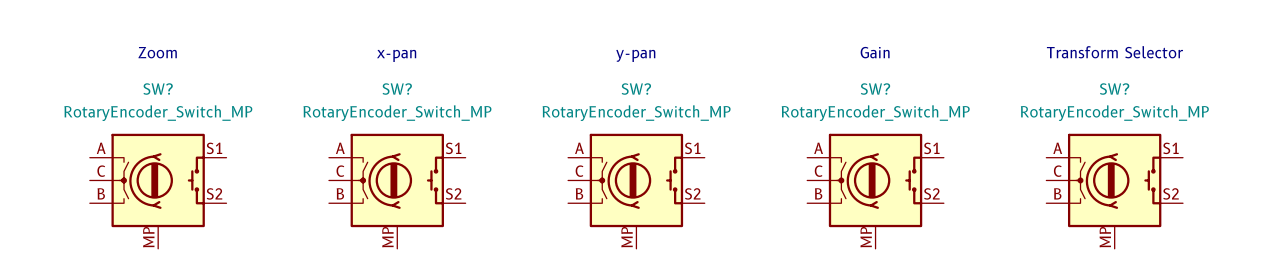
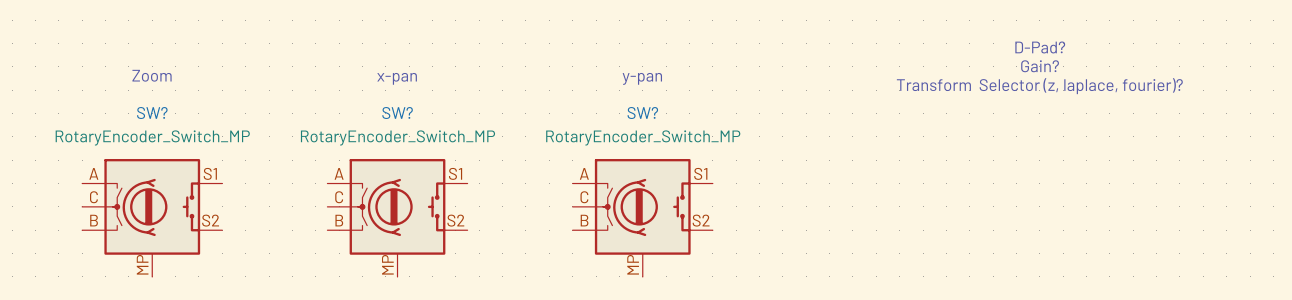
text: none -> D-Pad? (1040, 47)
text: none -> Gain? (1040, 66)
text: Gain (875, 52) -> none
text: Transform Selector (1114, 52) -> none
text: none -> Transform Selector (z, laplace, fourier)? (1039, 86)
SW?: RotaryEncoder_Switch_MP (875, 191) -> none
SW?: RotaryEncoder_Switch_MP (1114, 191) -> none

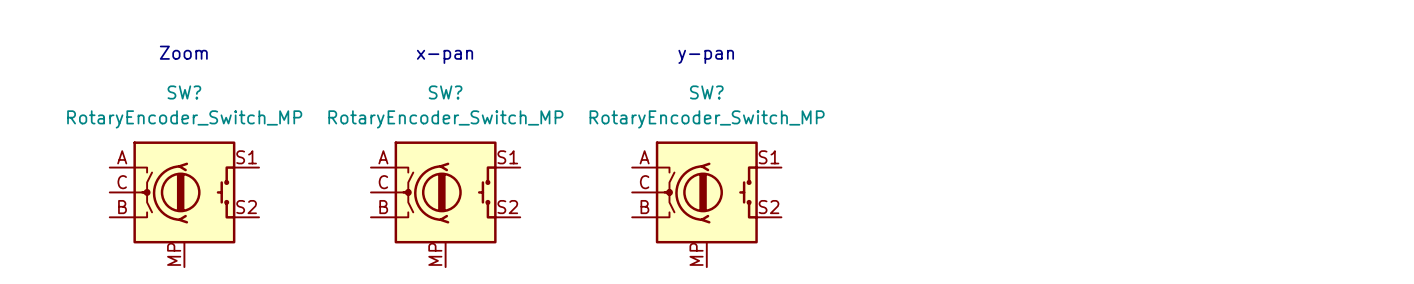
text: D-Pad? (1040, 47) -> none
text: Gain? (1040, 66) -> none
text: Transform Selector (z, laplace, fourier)? (1039, 86) -> none

